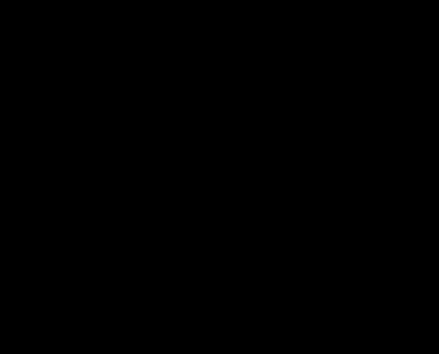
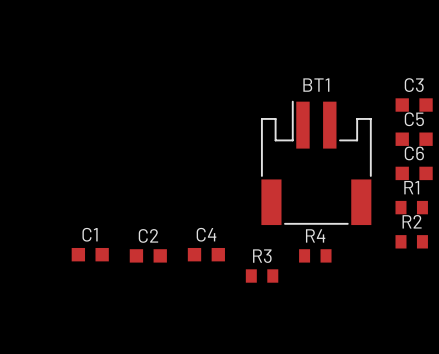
C3: none -> (414, 105)
C5: none -> (414, 139)
BT1: none -> (316, 162)
C6: none -> (414, 173)
R1: none -> (411, 207)
R2: none -> (411, 241)
C1: none -> (90, 254)
C4: none -> (206, 254)
C2: none -> (148, 255)
R4: none -> (315, 255)
R3: none -> (262, 276)

